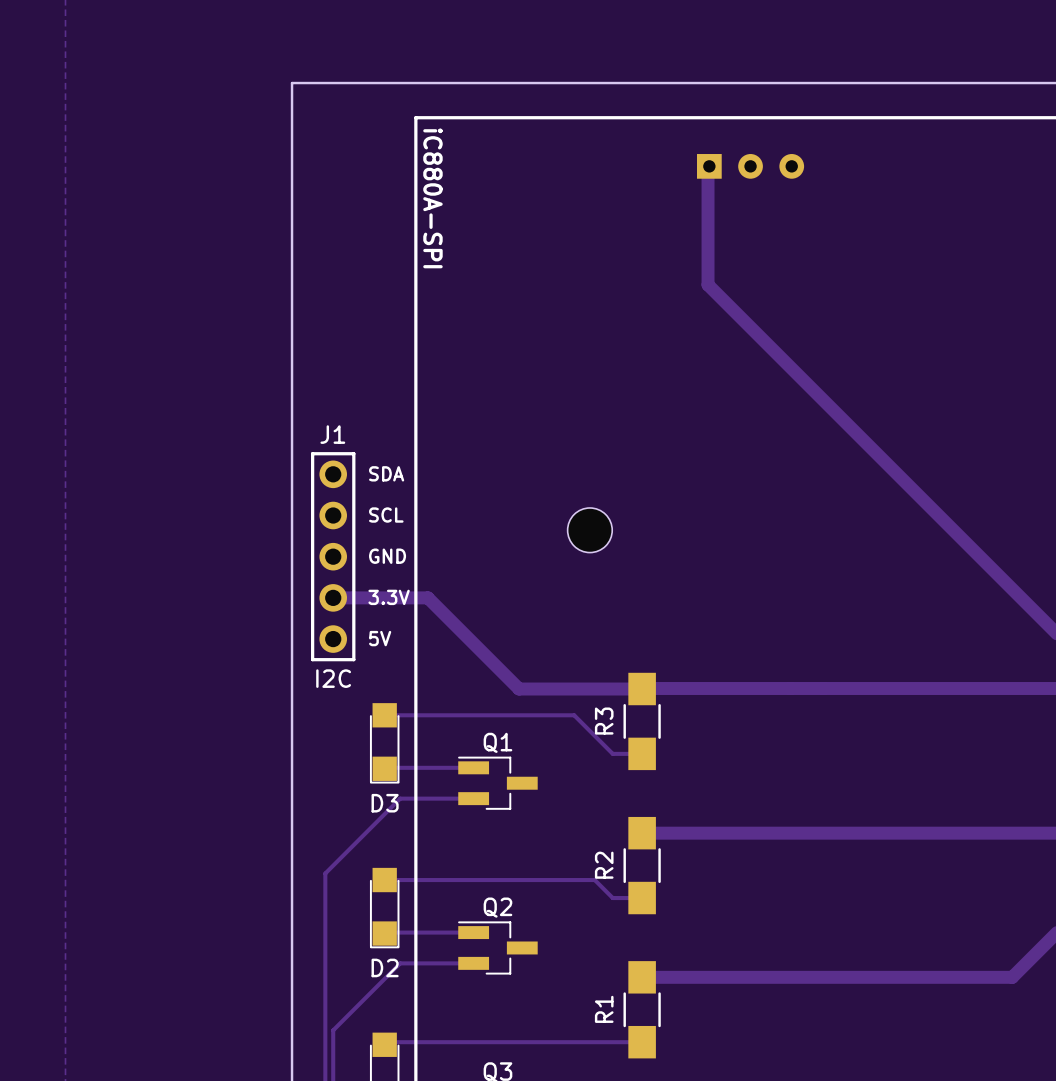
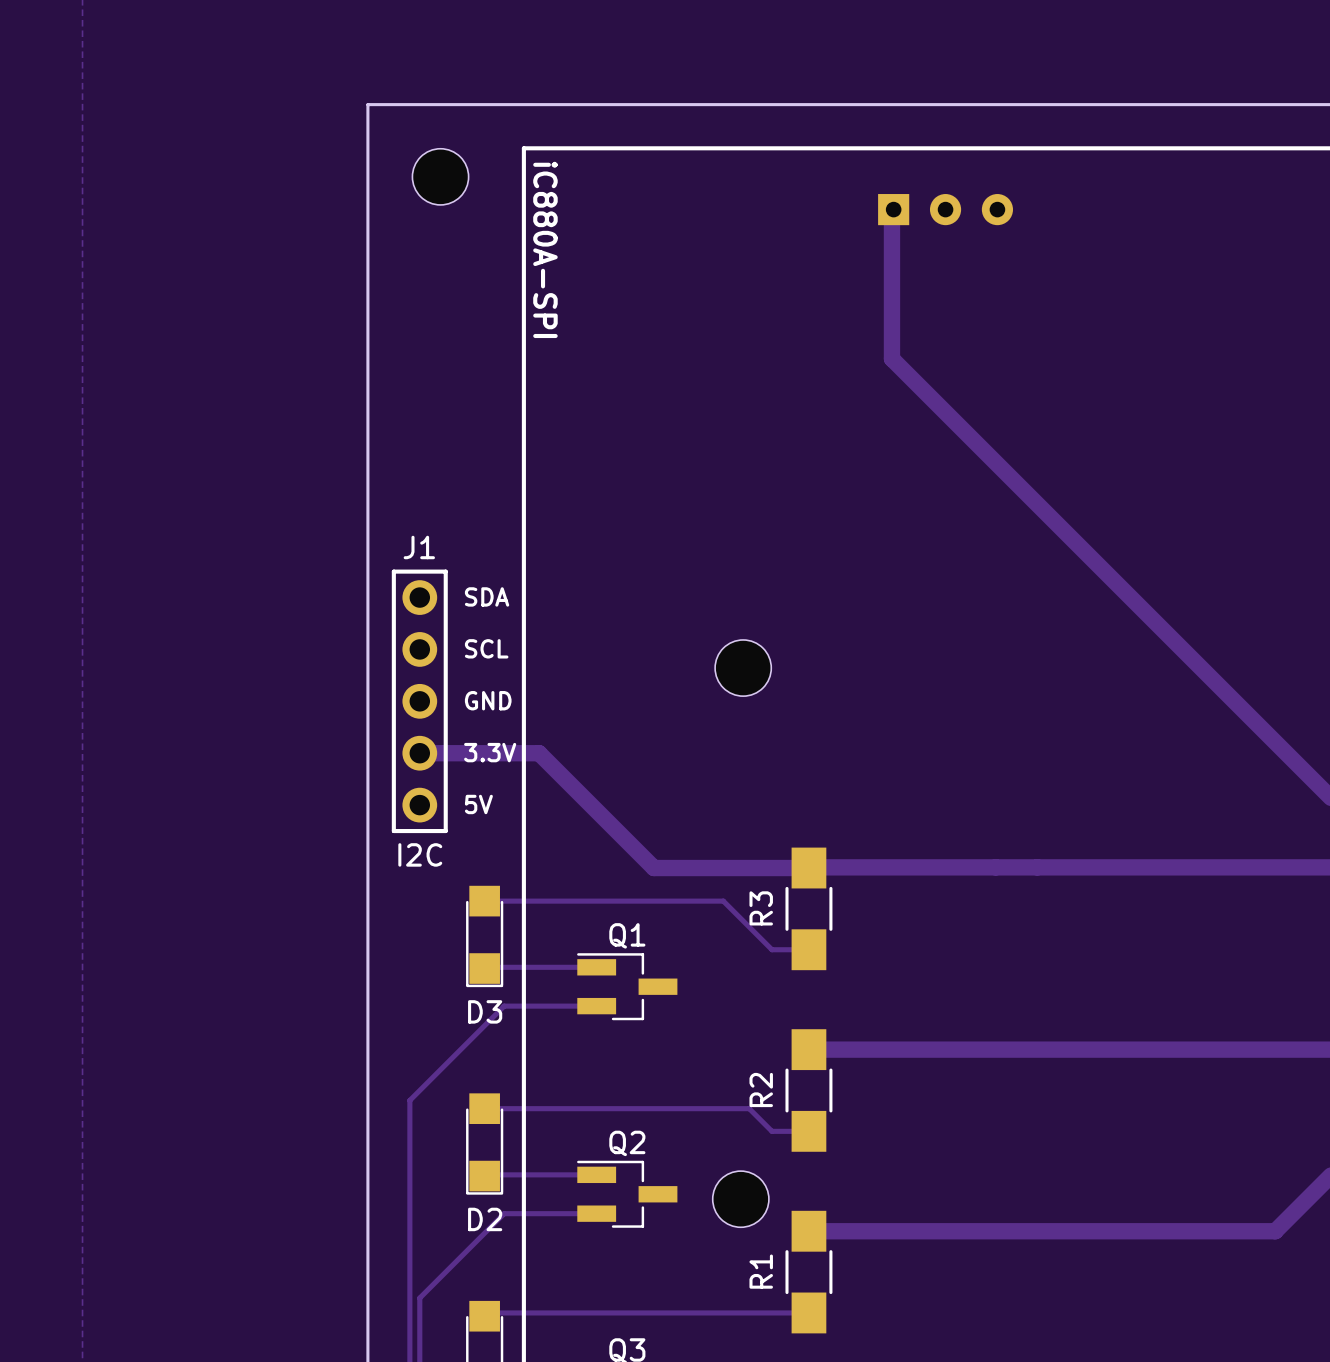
part: none -> (440, 176)
part: none -> (740, 1199)

